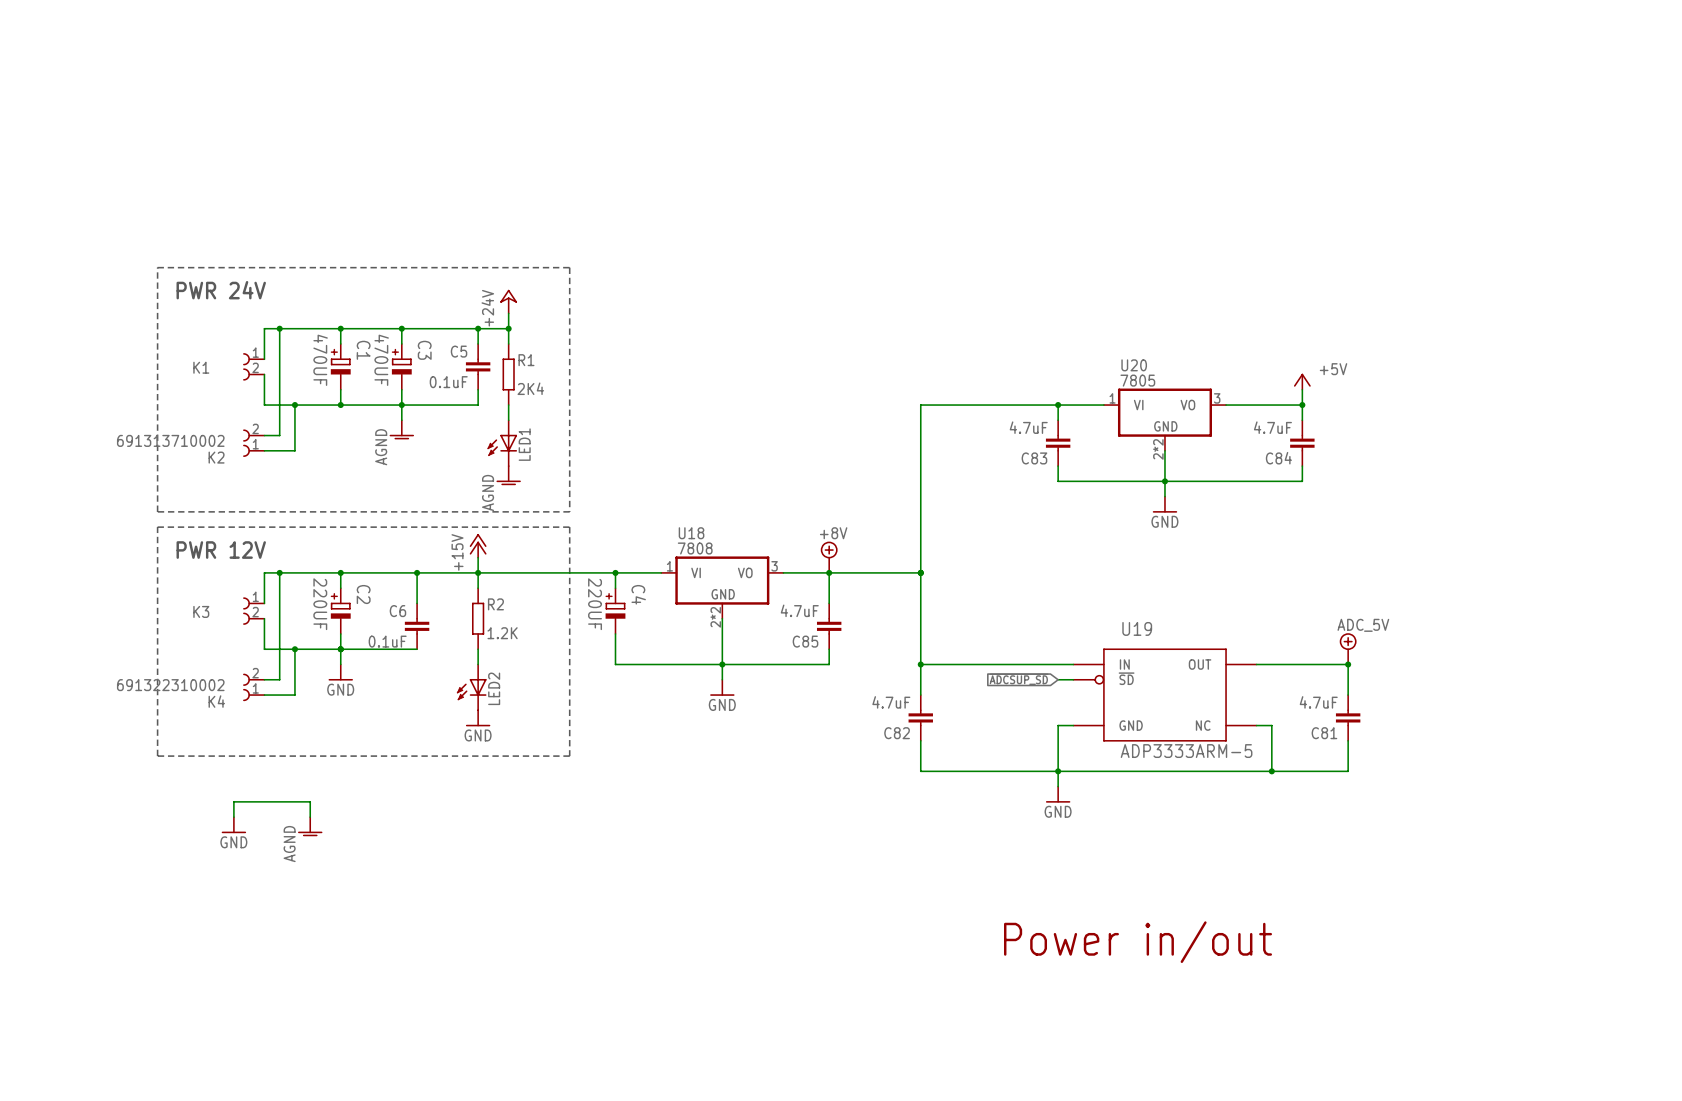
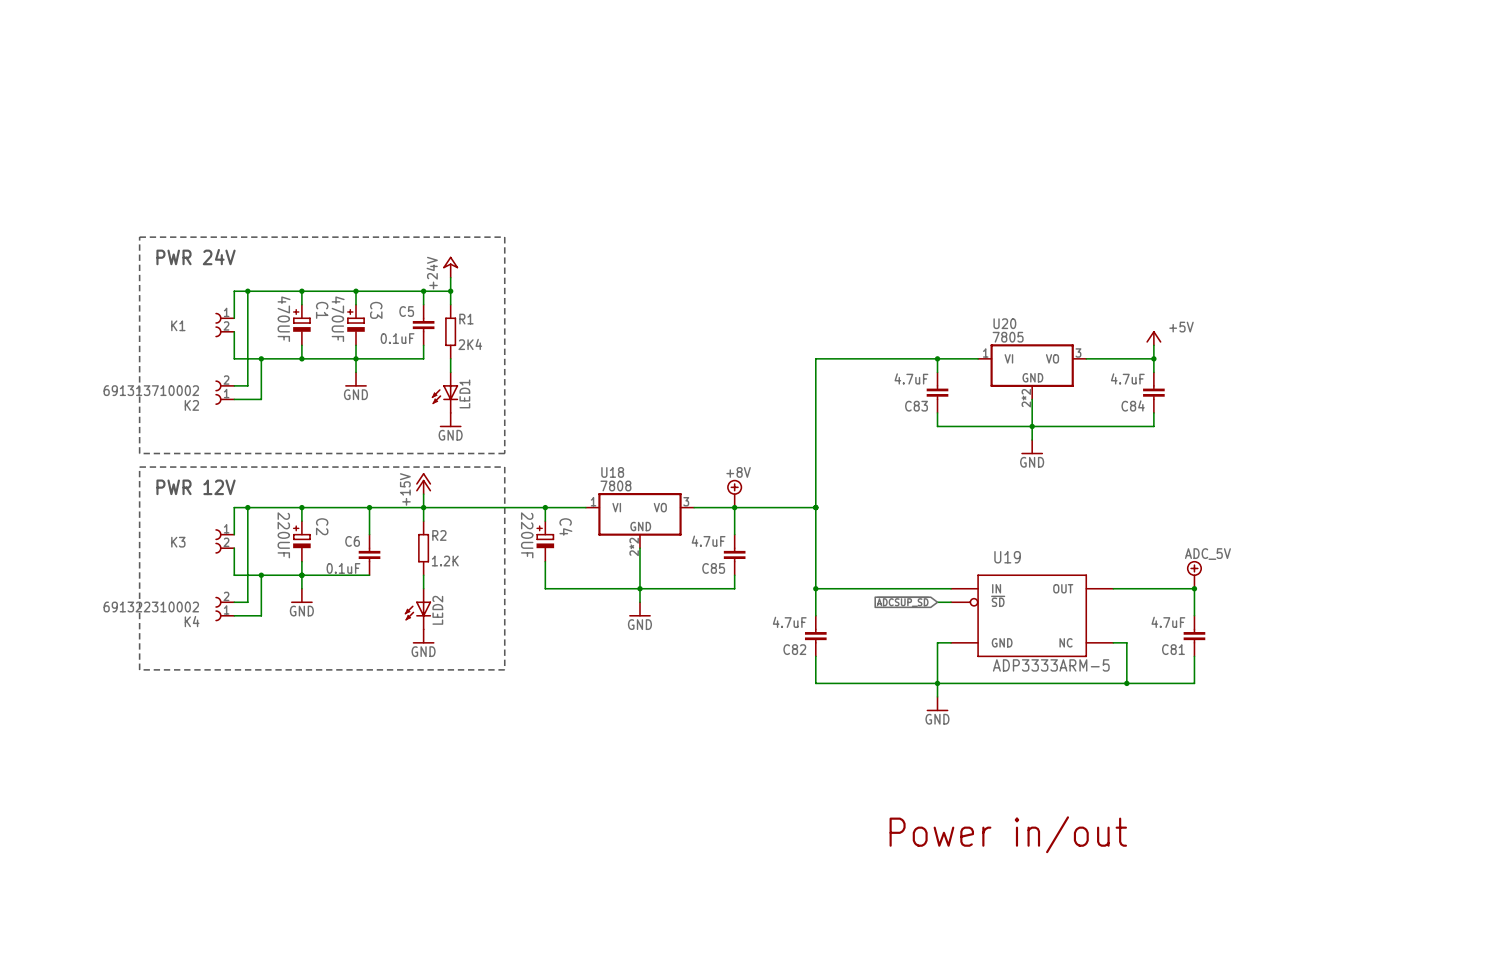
power symbol: AGND (401, 429) -> GND (356, 379)
power symbol: AGND (508, 475) -> GND (450, 420)
wire: (233, 817) (233, 801) (310, 801) (310, 817) -> none
power symbol: GND (233, 825) -> none
power symbol: AGND (310, 826) -> none

